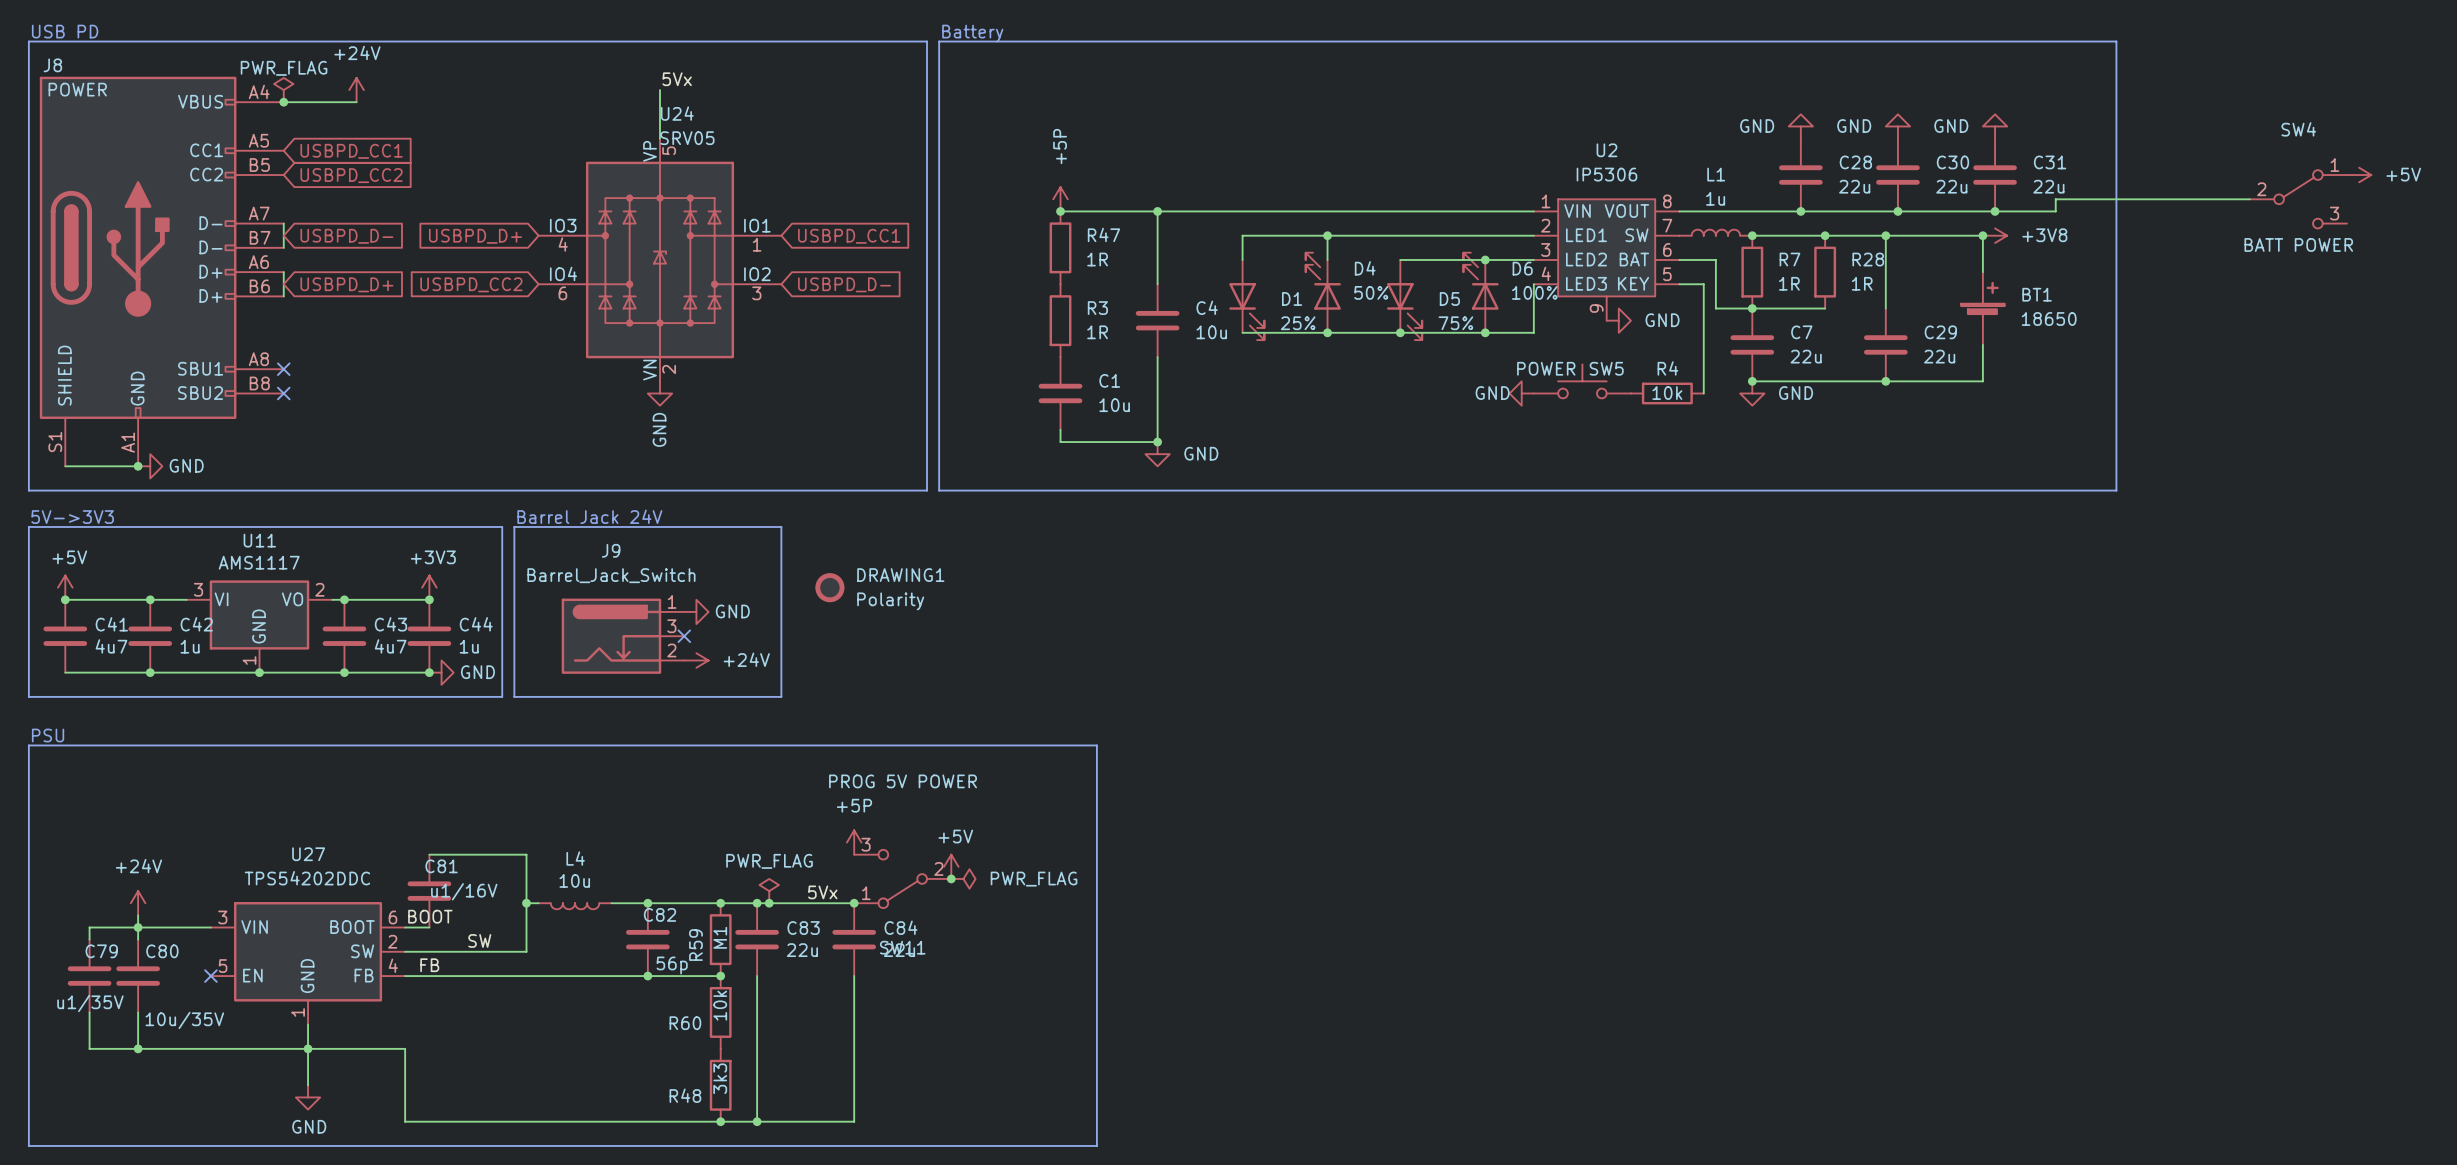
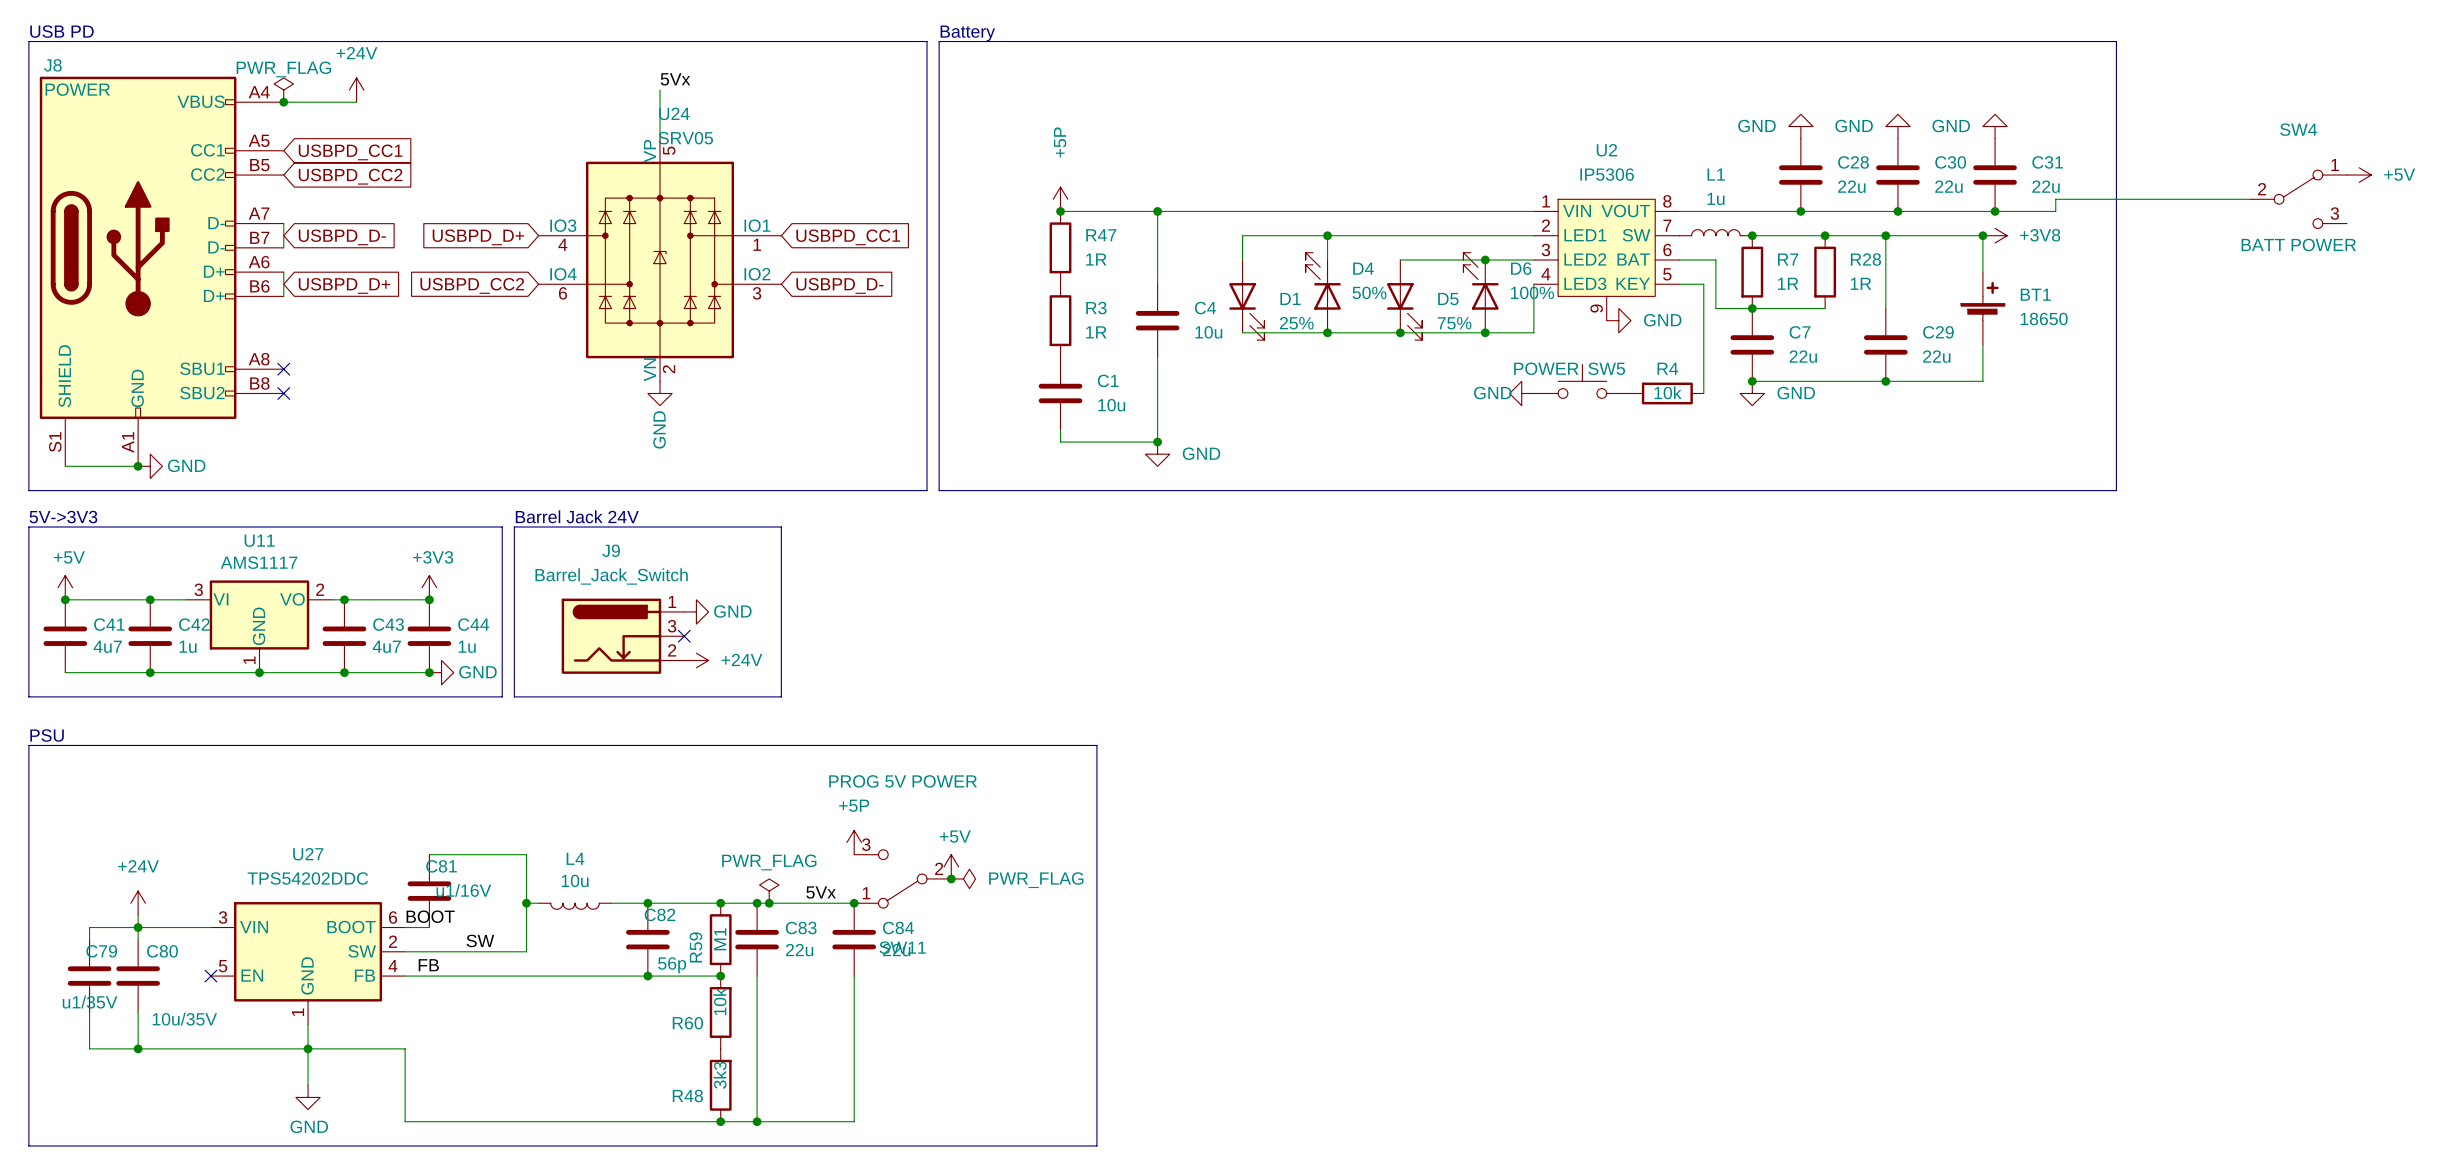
DRAWING1: Polarity (829, 587) -> none

